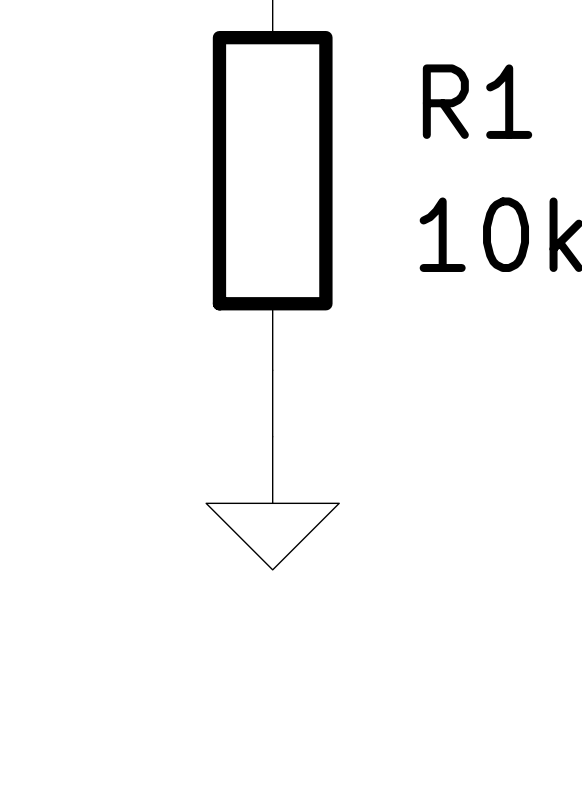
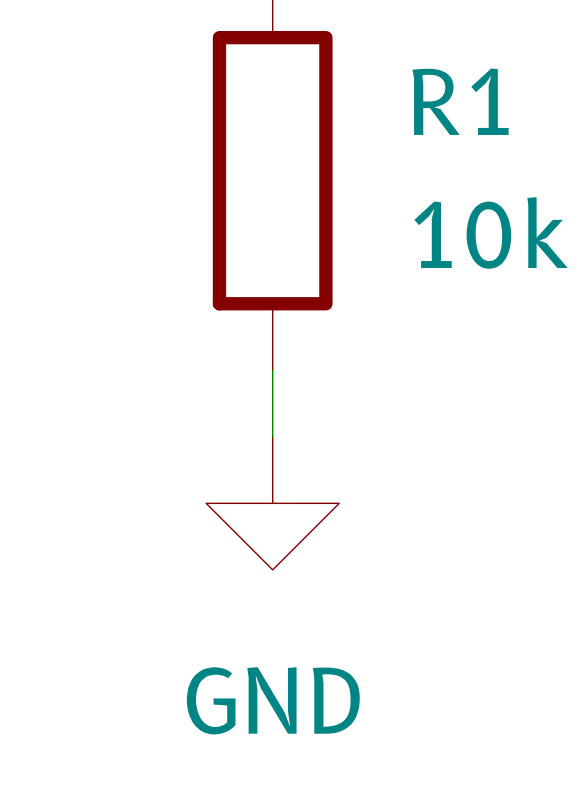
power symbol text: none -> GND (273, 700)

